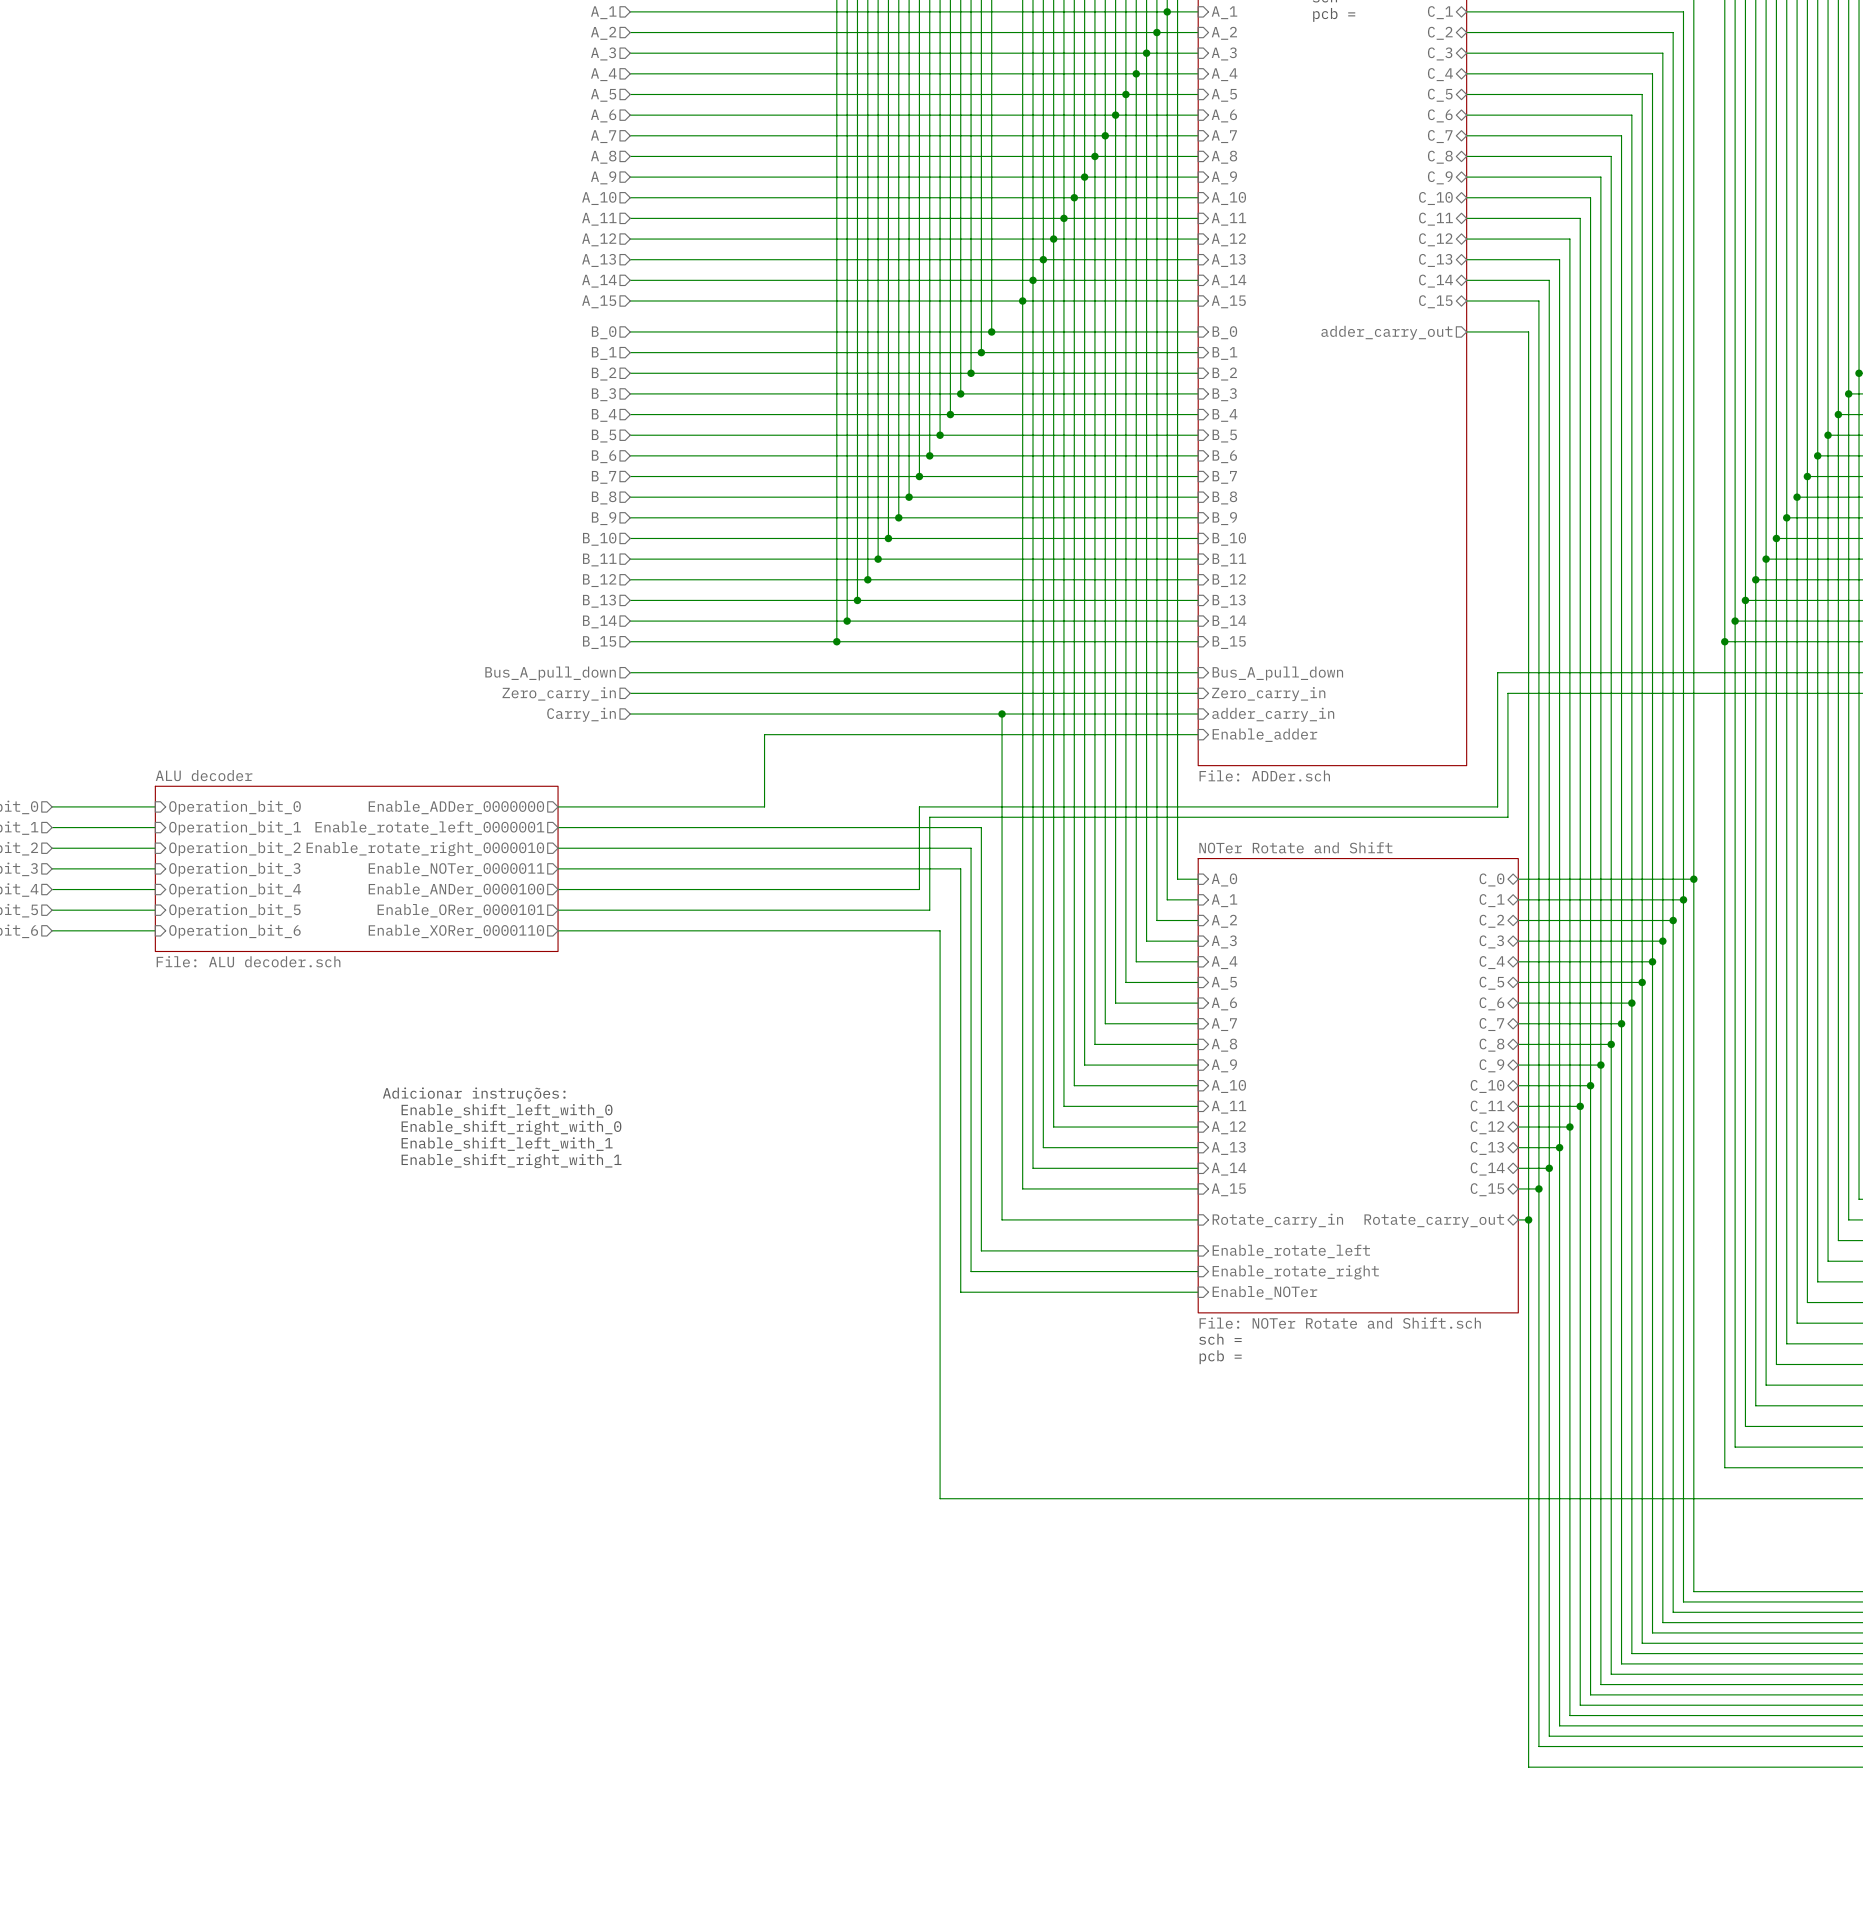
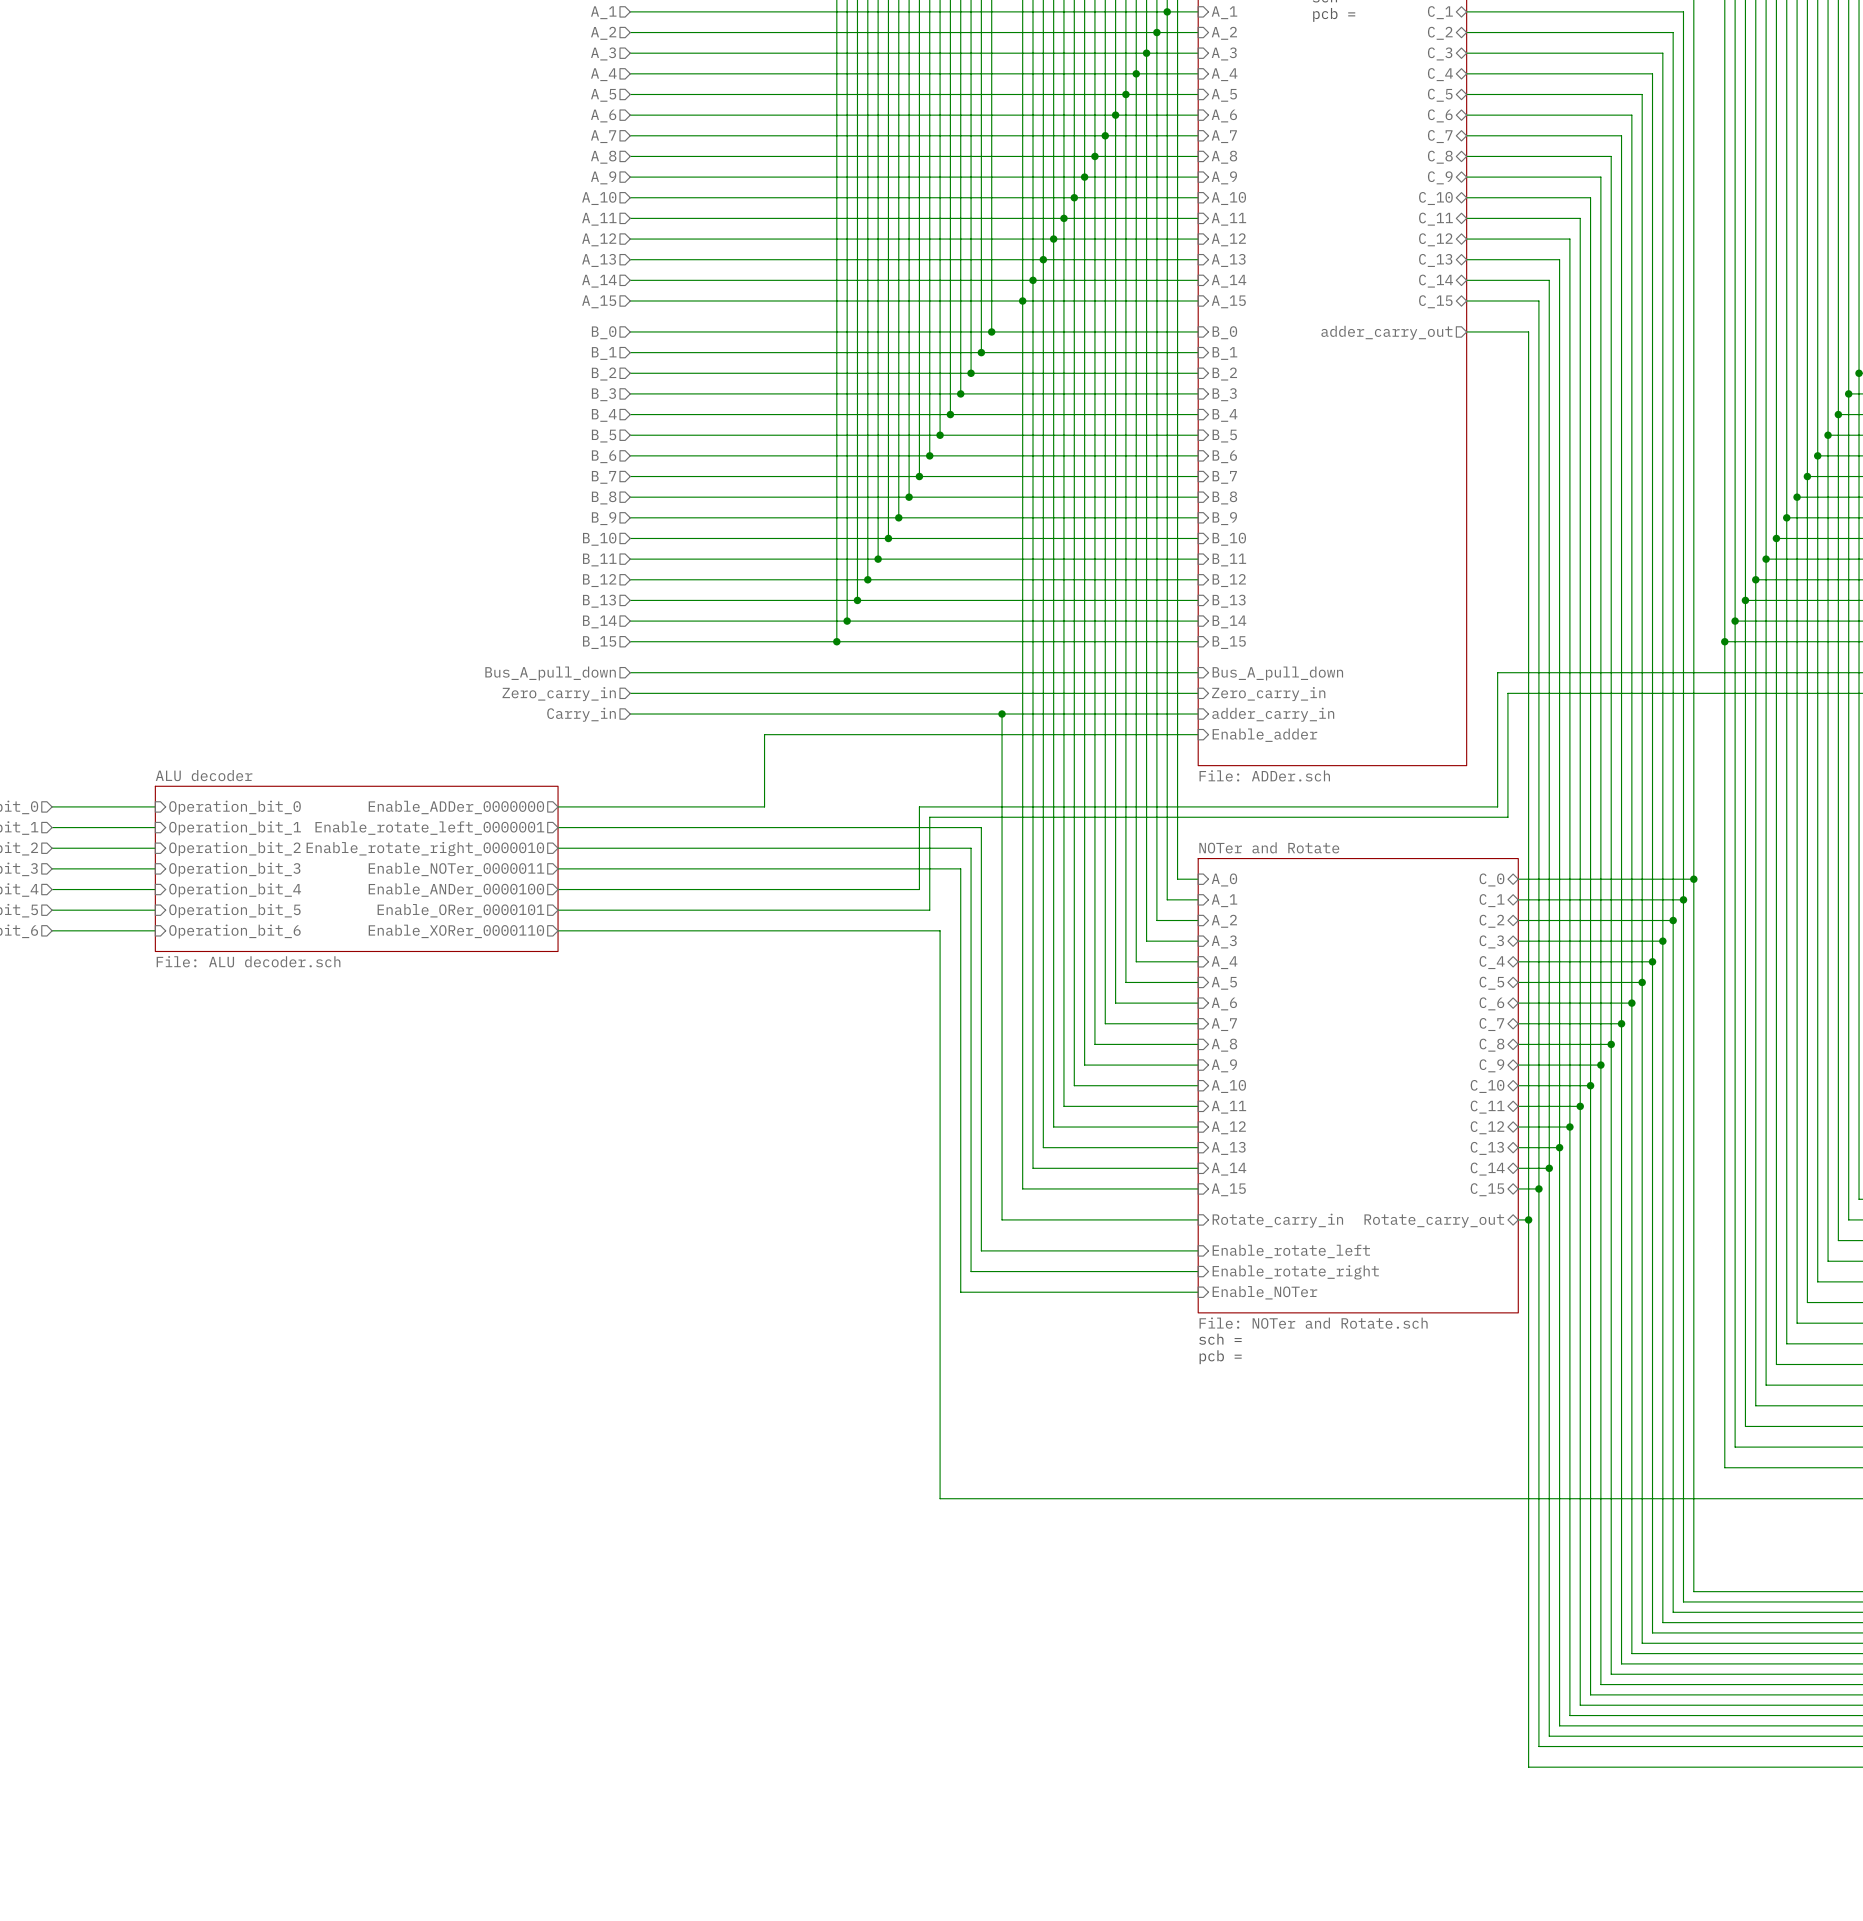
sheet NOTer Rotate and Shift name: NOTer Rotate and Shift (1295, 847) -> NOTer and Rotate (1269, 847)
text: Adicionar instruções: (474, 1094) -> none
text: Enable_shift_left_with_0 (507, 1110) -> none
text: Enable_shift_right_with_0 (511, 1127) -> none
text: Enable_shift_left_with_1 (507, 1144) -> none
text: Enable_shift_right_with_1 (511, 1161) -> none
sheet NOTer Rotate and Shift value: File: NOTer Rotate and Shift.sch (1340, 1323) -> File: NOTer and Rotate.sch (1313, 1323)

